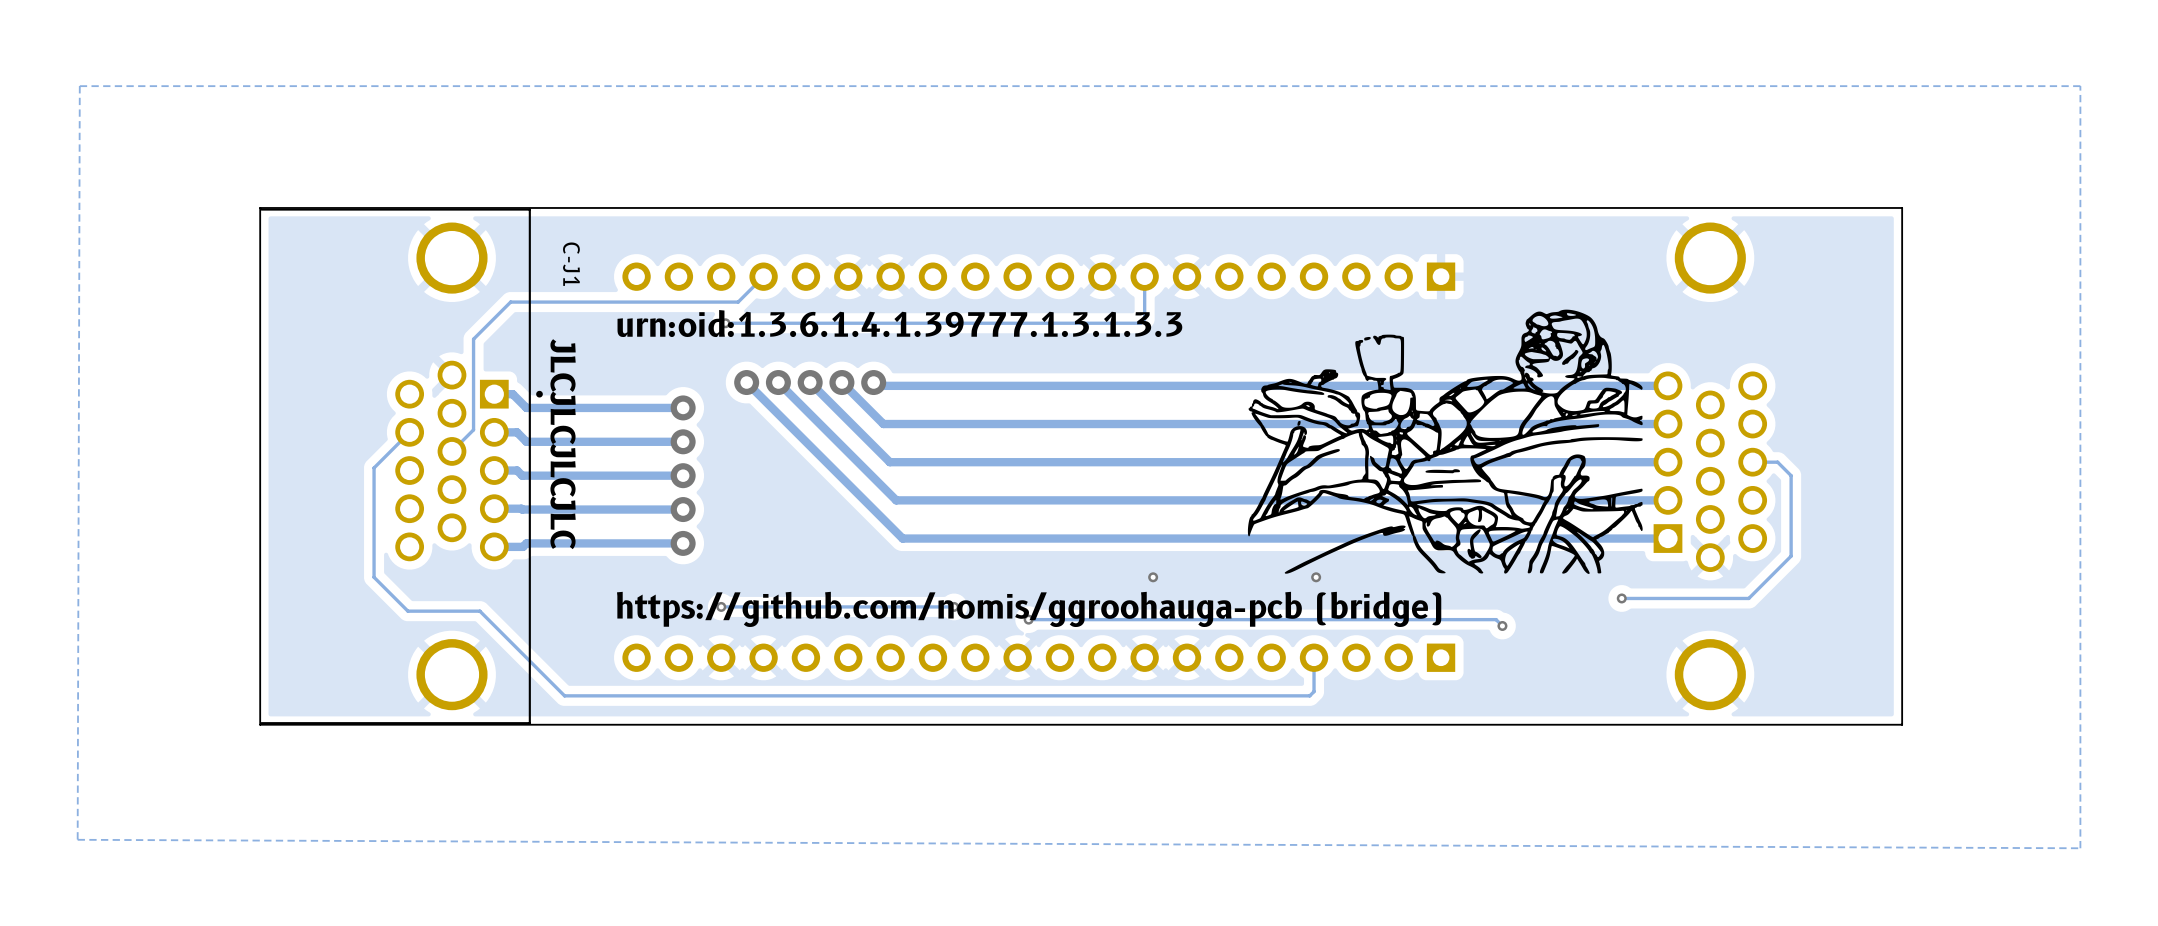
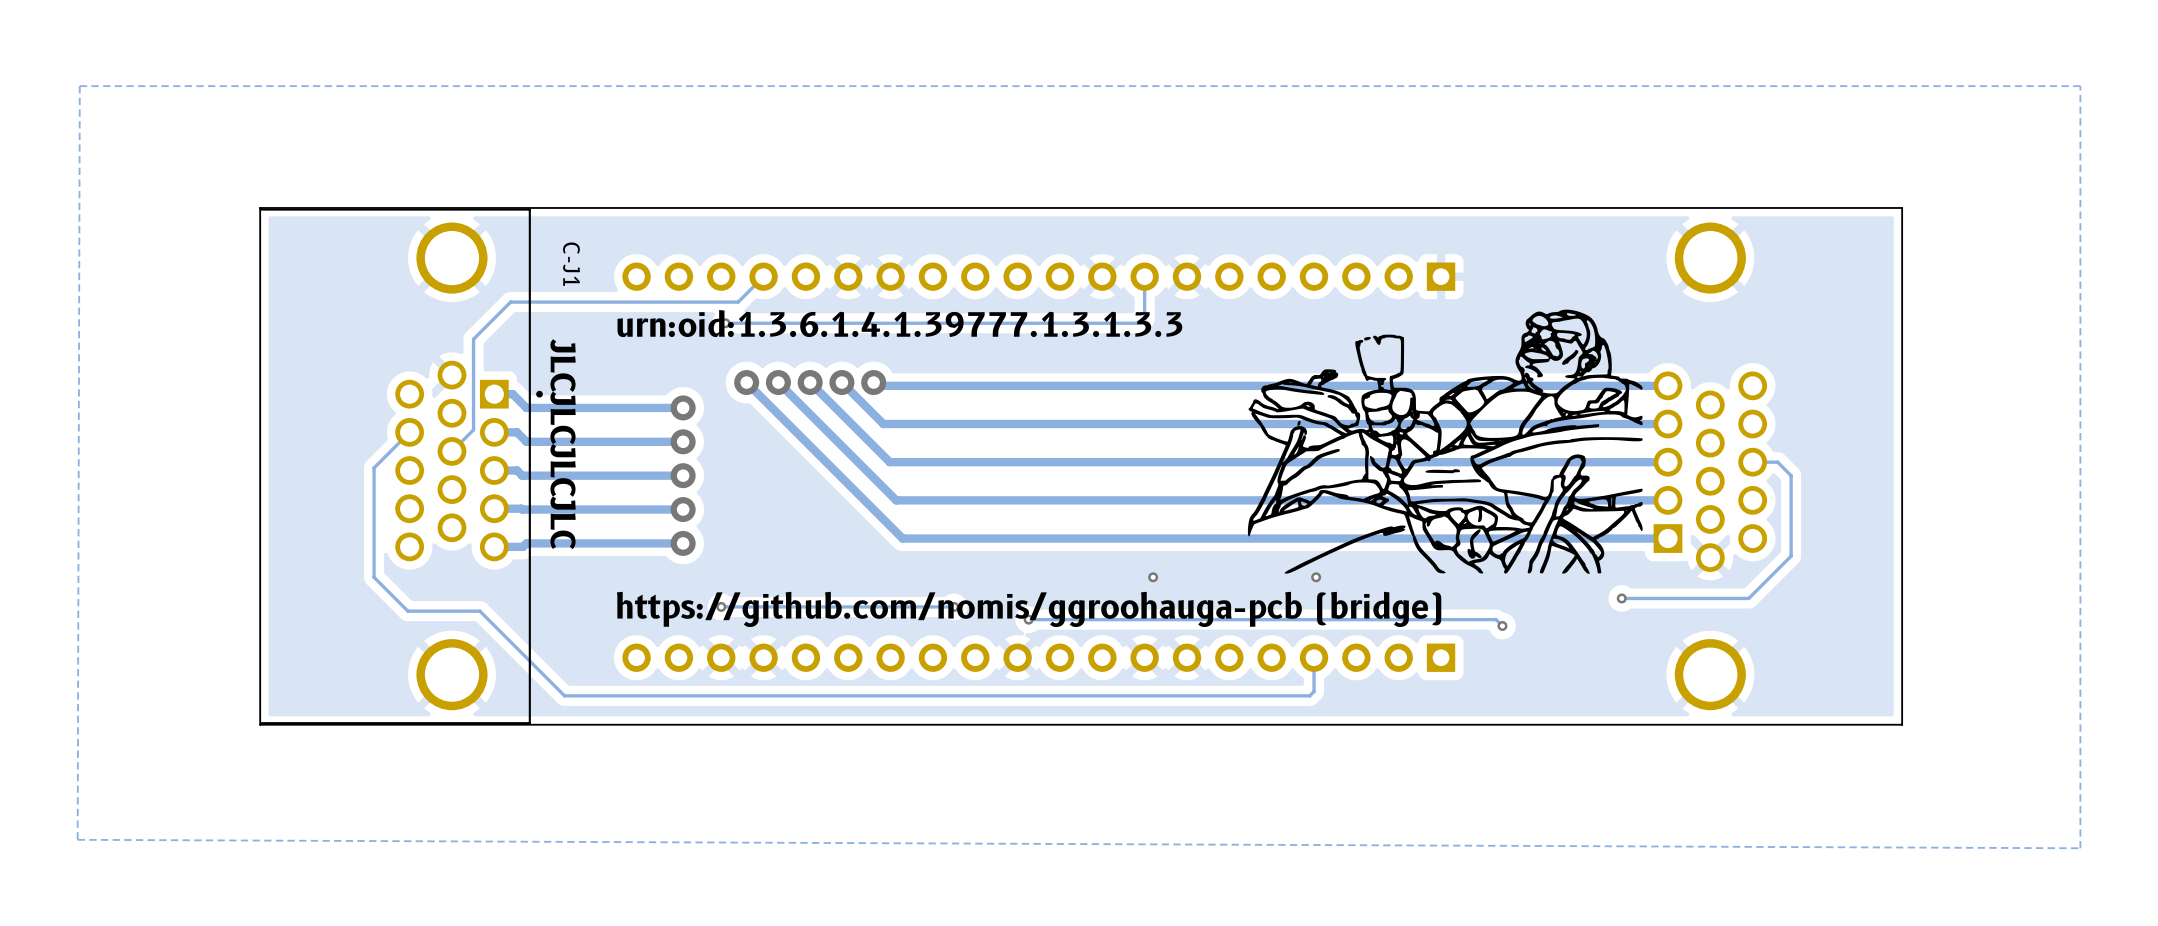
drawing shape: [1247, 309, 1643, 574] -> [1247, 309, 1643, 574]

